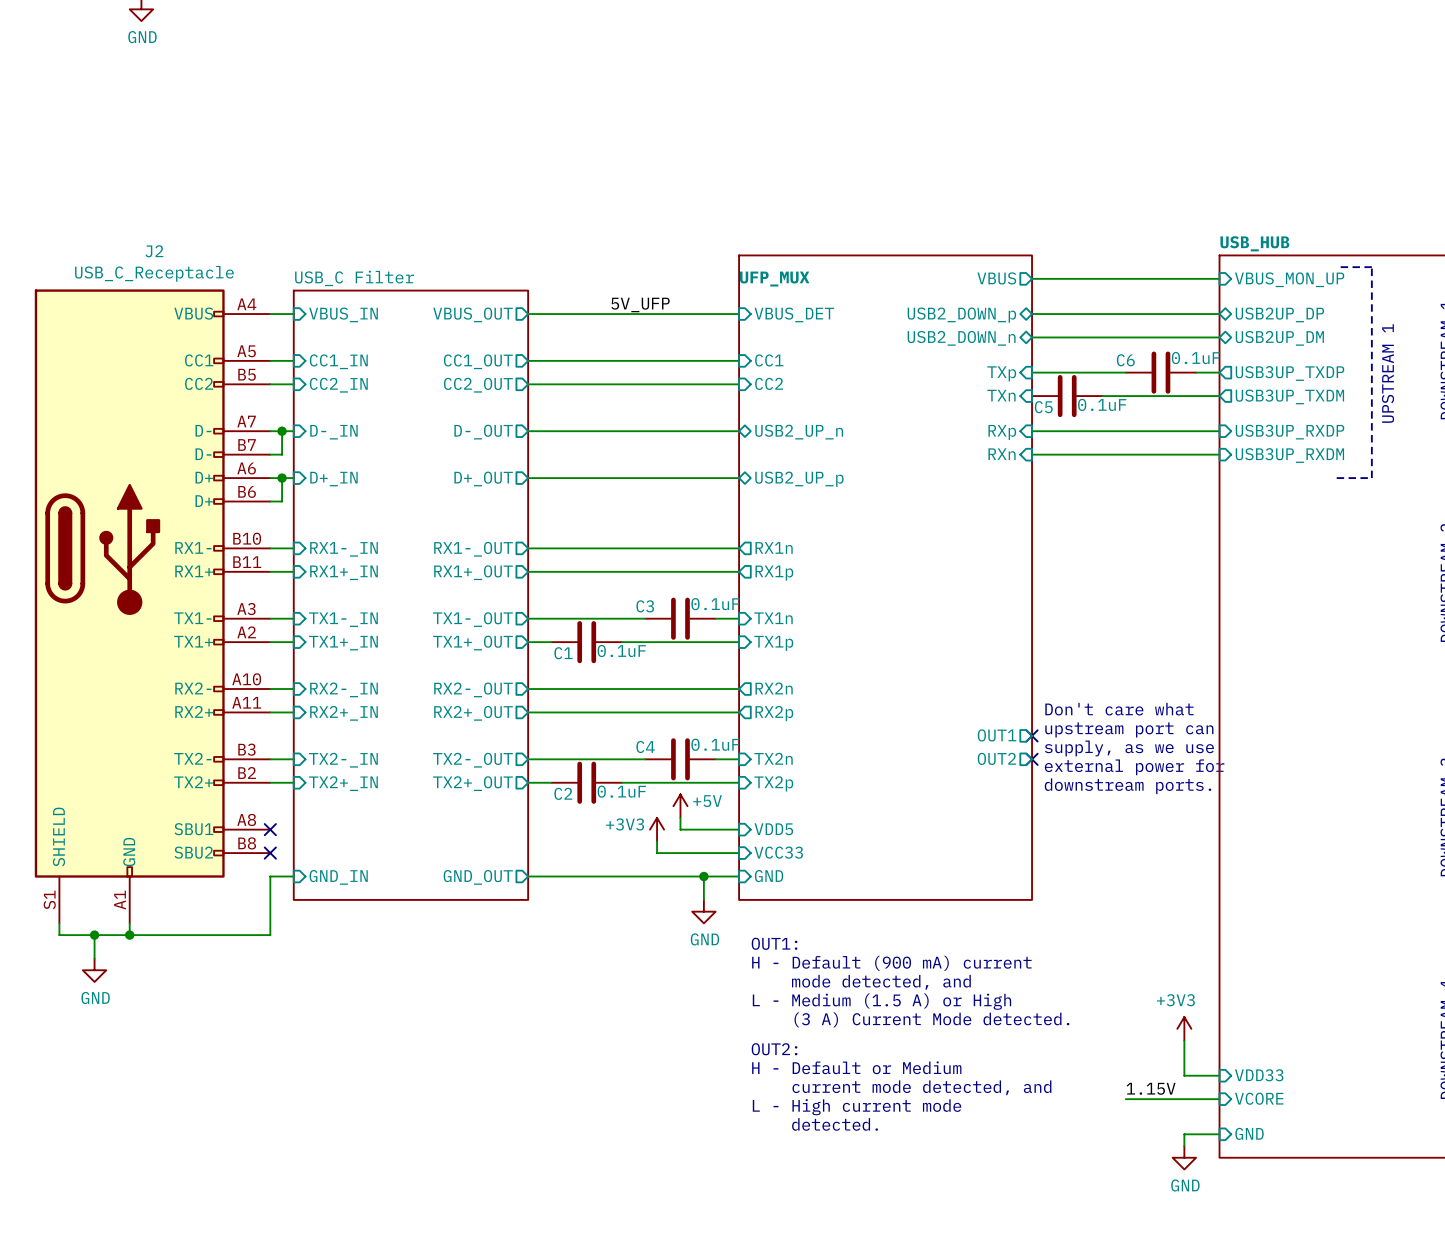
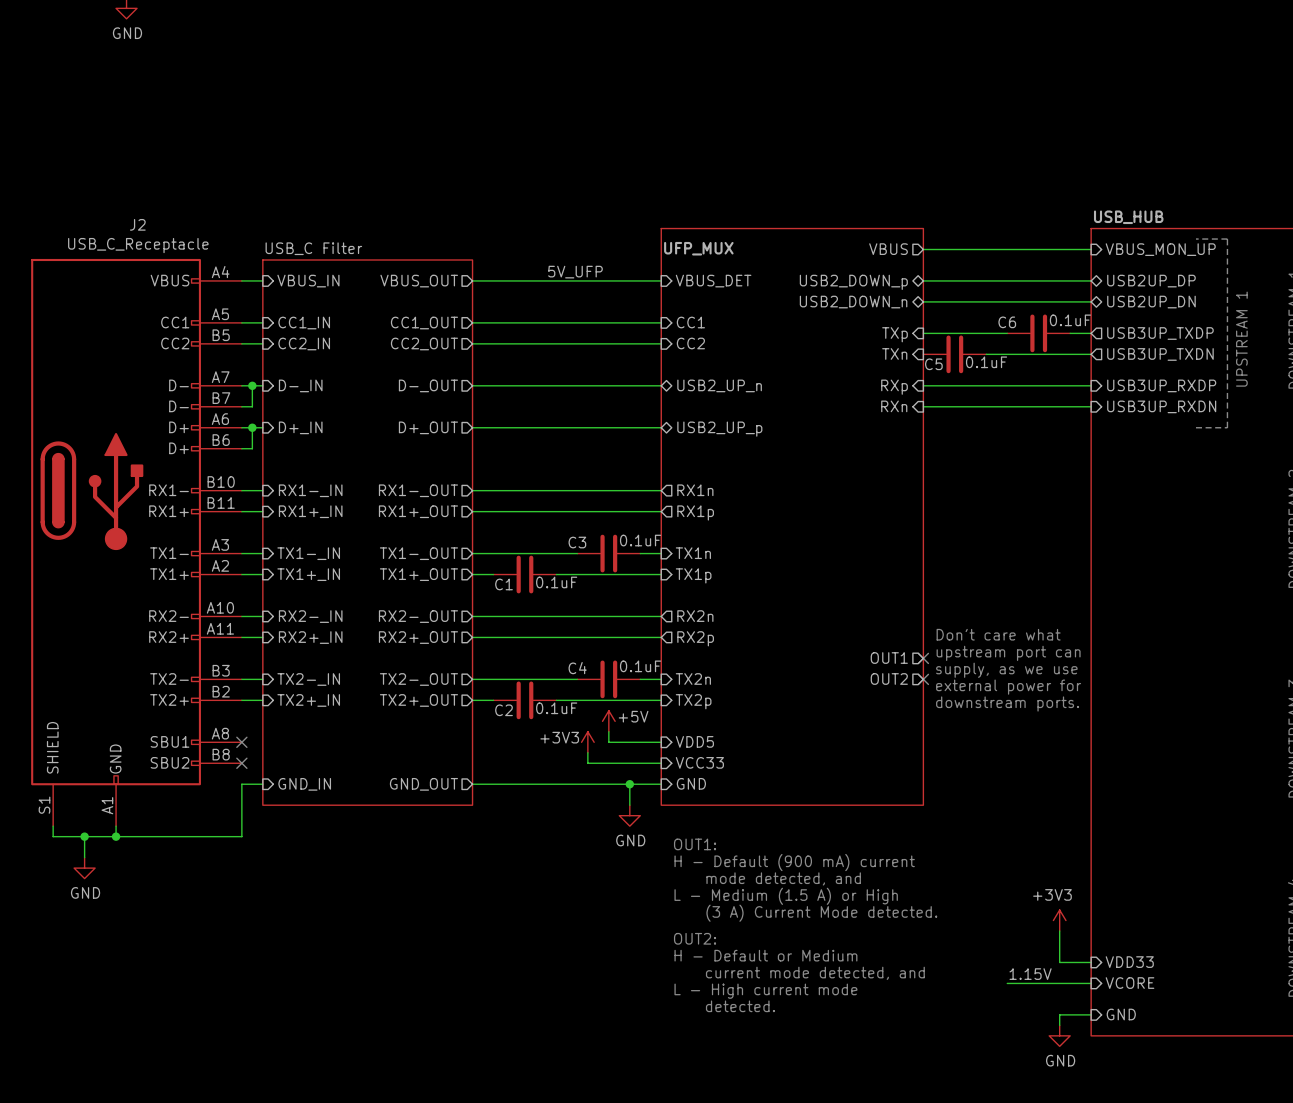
sheet pin: USB2UP_DM (1279, 338) -> USB2UP_DN (1151, 302)
sheet pin: USB3UP_TXDM (1289, 396) -> USB3UP_TXDN (1160, 354)
sheet pin: USB3UP_RXDM (1289, 455) -> USB3UP_RXDN (1161, 406)

